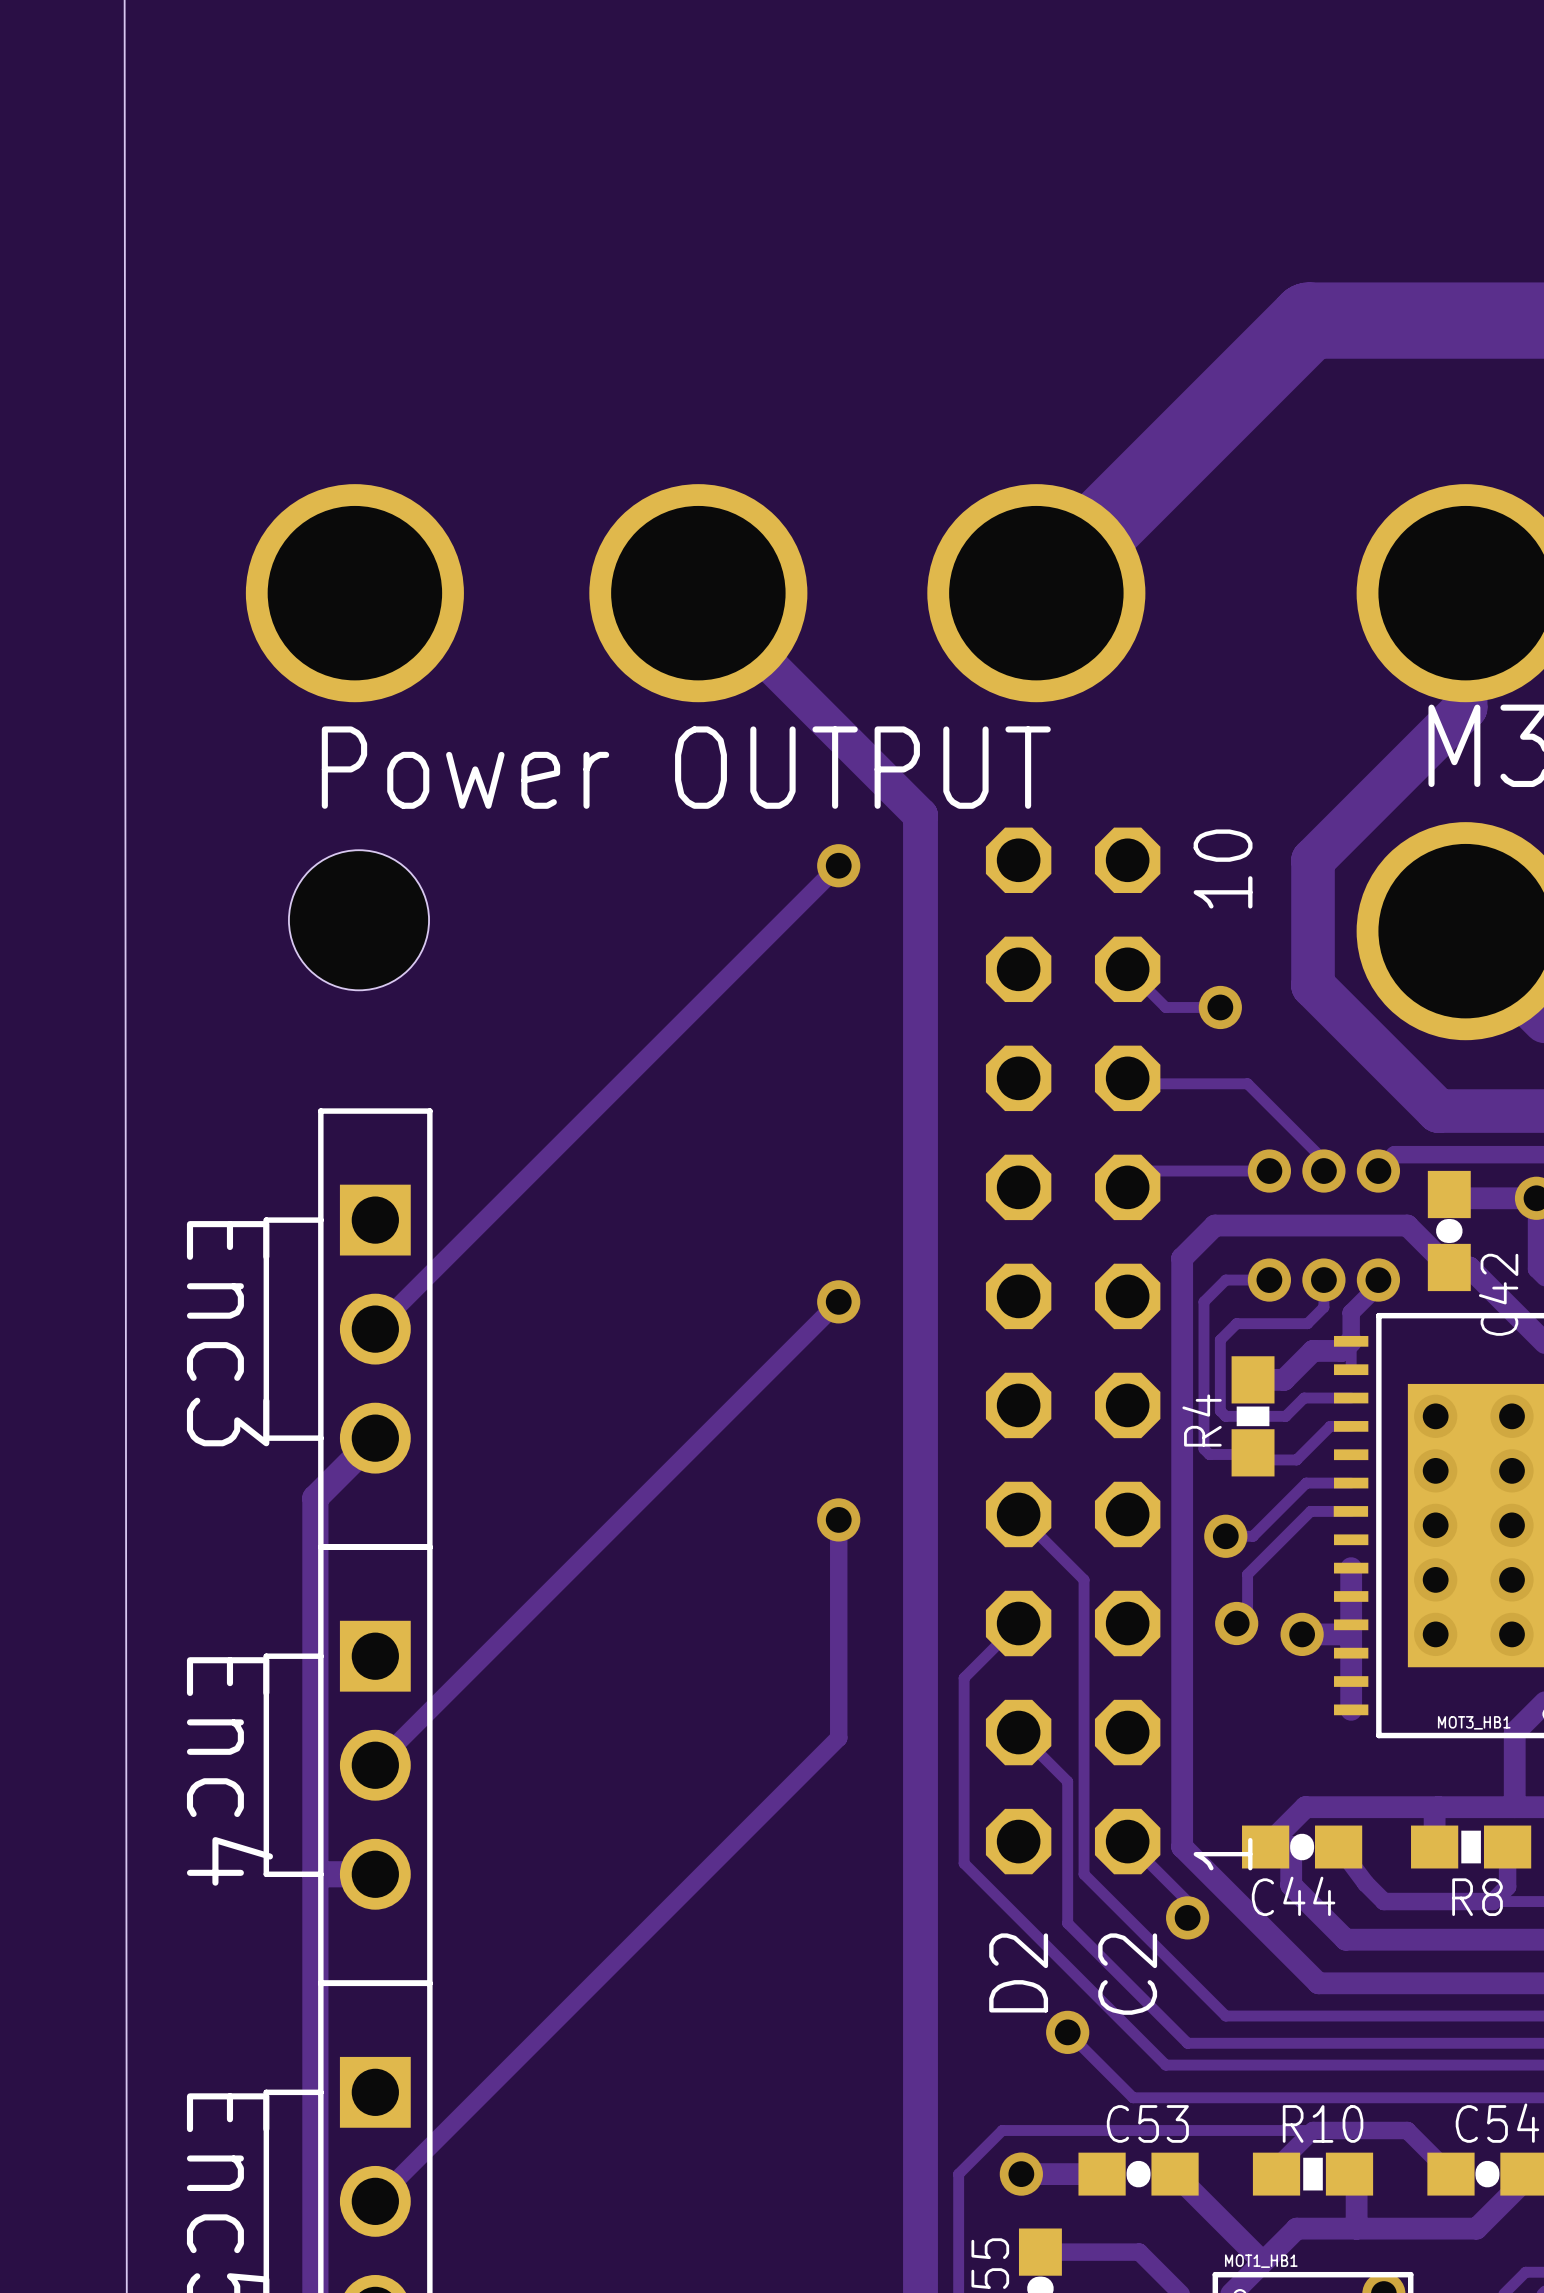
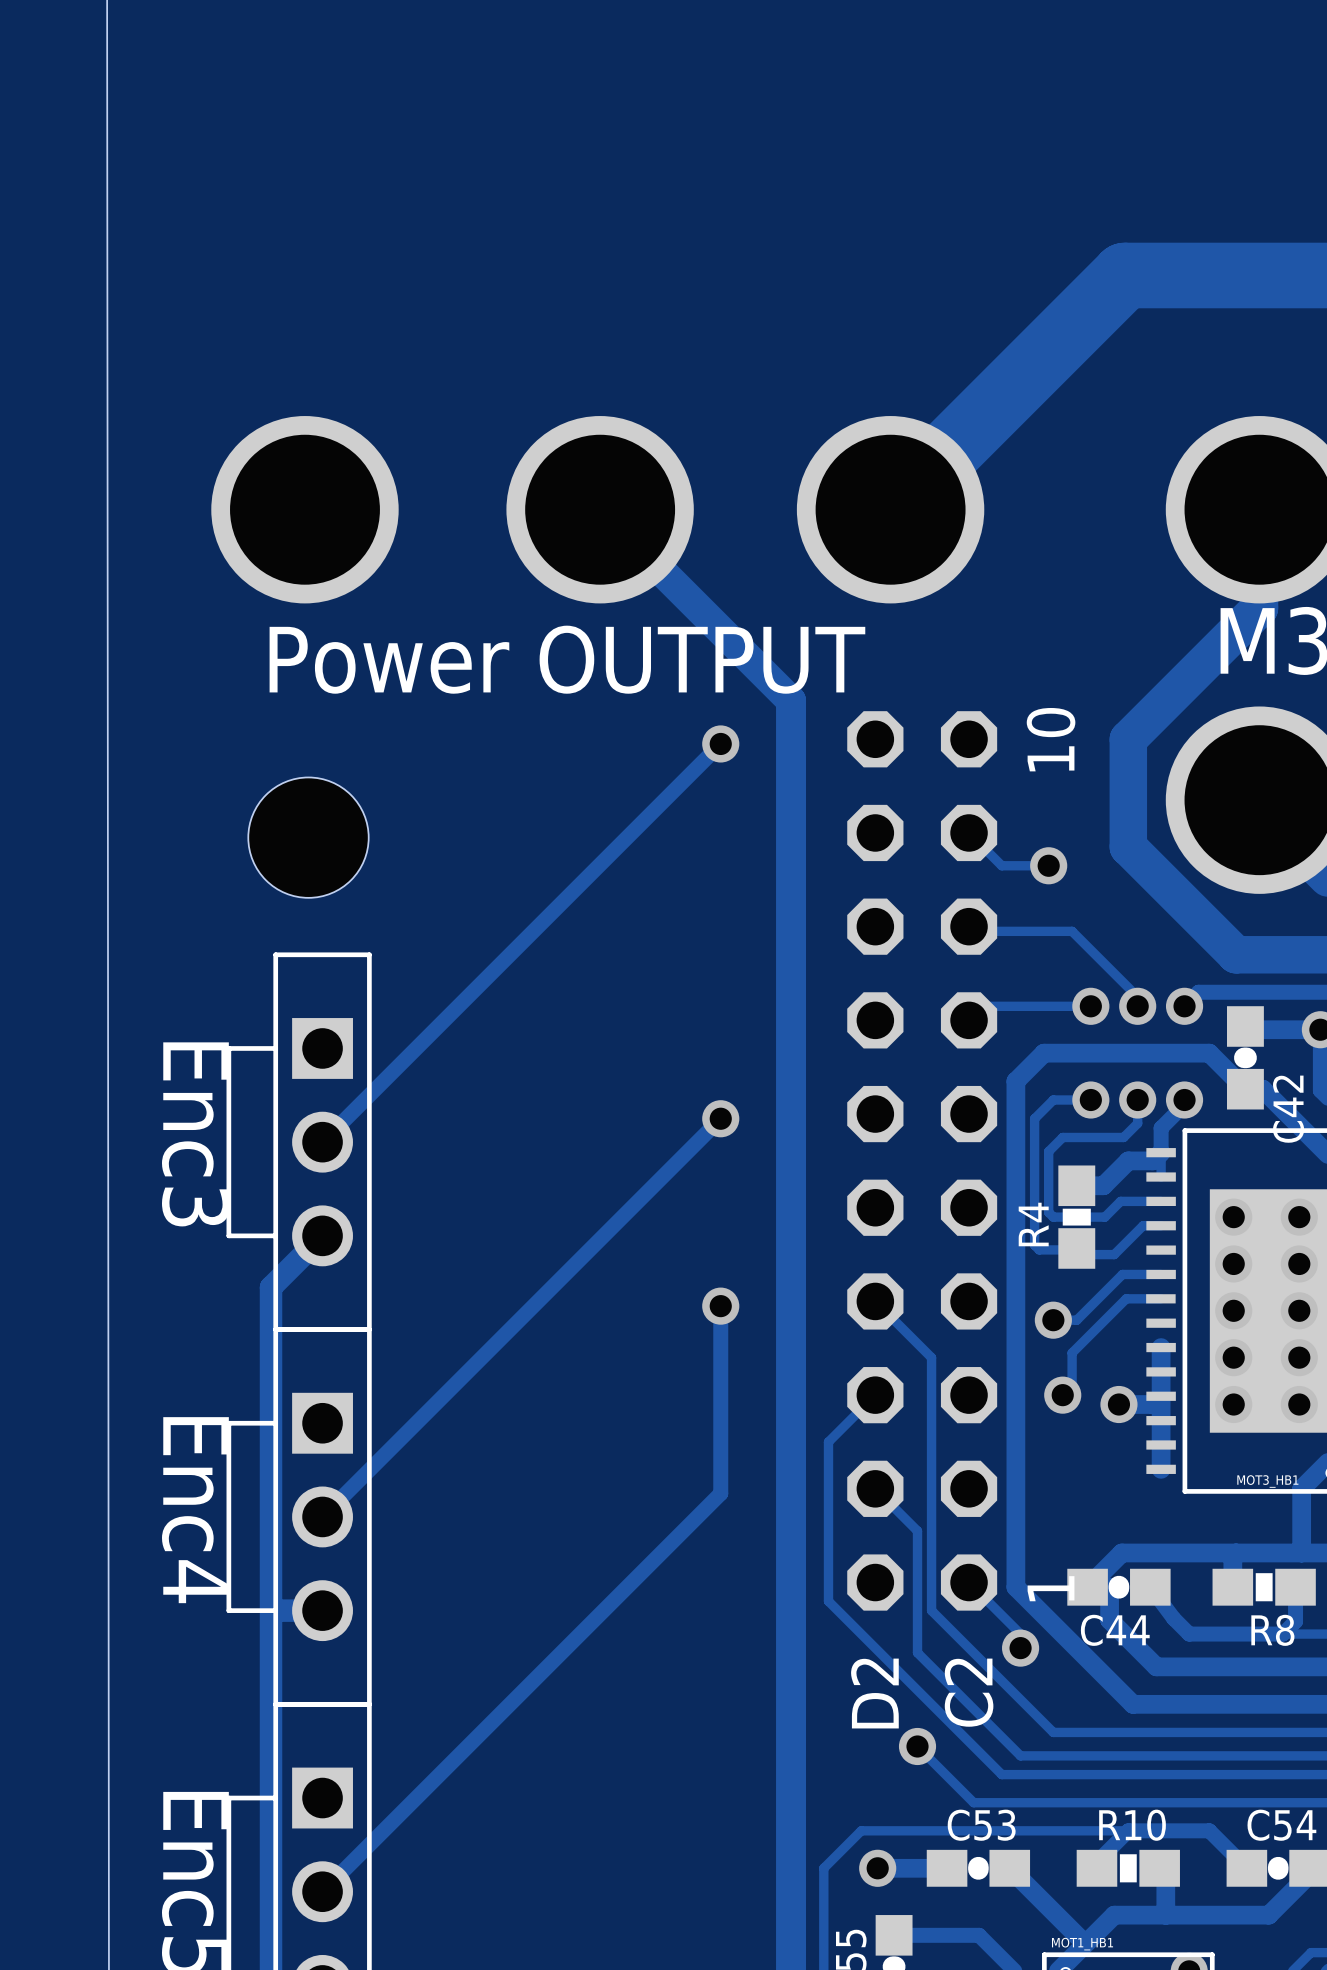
part position: (358, 920) -> (308, 837)

